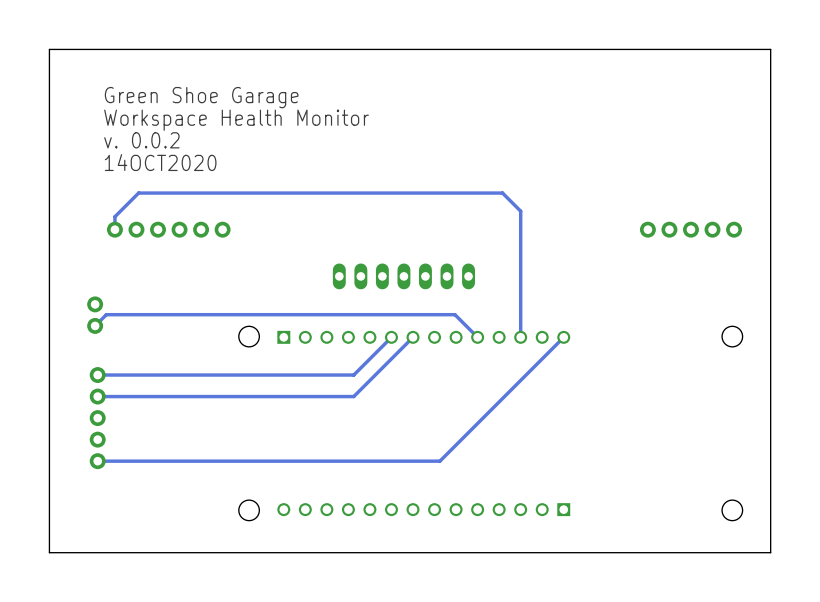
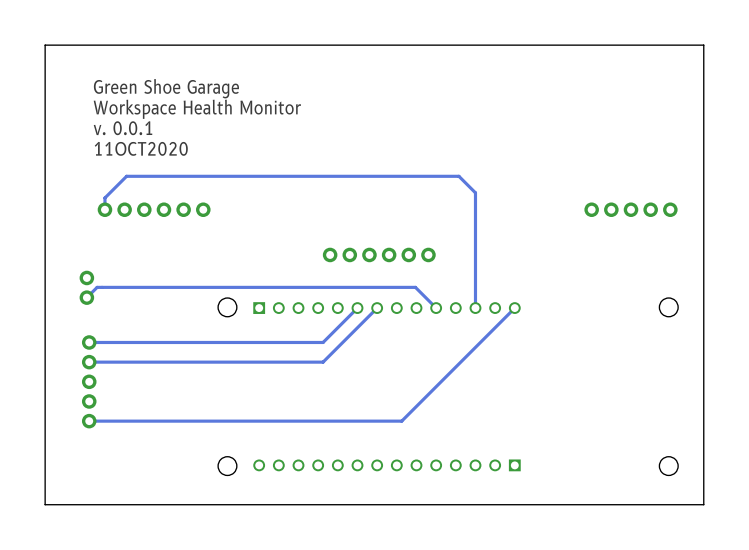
text: v. 0.0.2 (141, 140) -> v. 0.0.1 (123, 128)
text: 14OCT2020 (160, 162) -> 11OCT2020 (141, 148)
part: (403, 276) -> none
part: none -> (379, 254)

